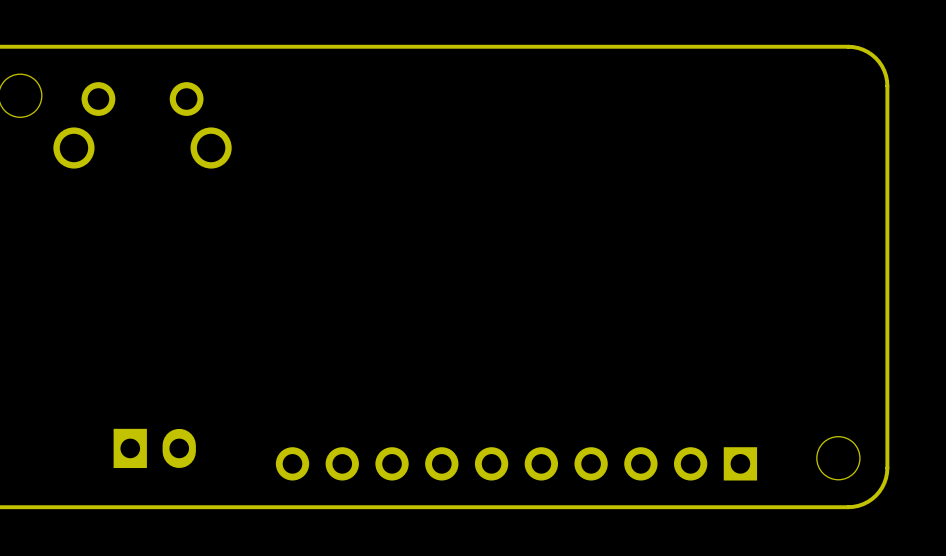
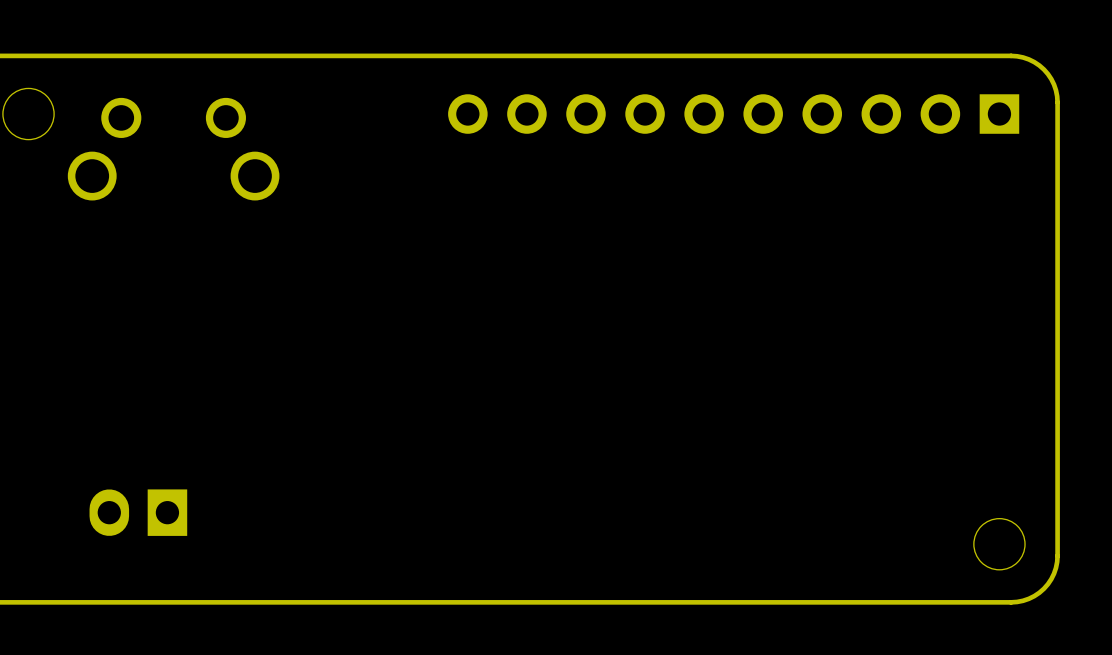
part rotation: 0° (154, 448) -> 180° (138, 512)
part position: (516, 463) -> (733, 114)

